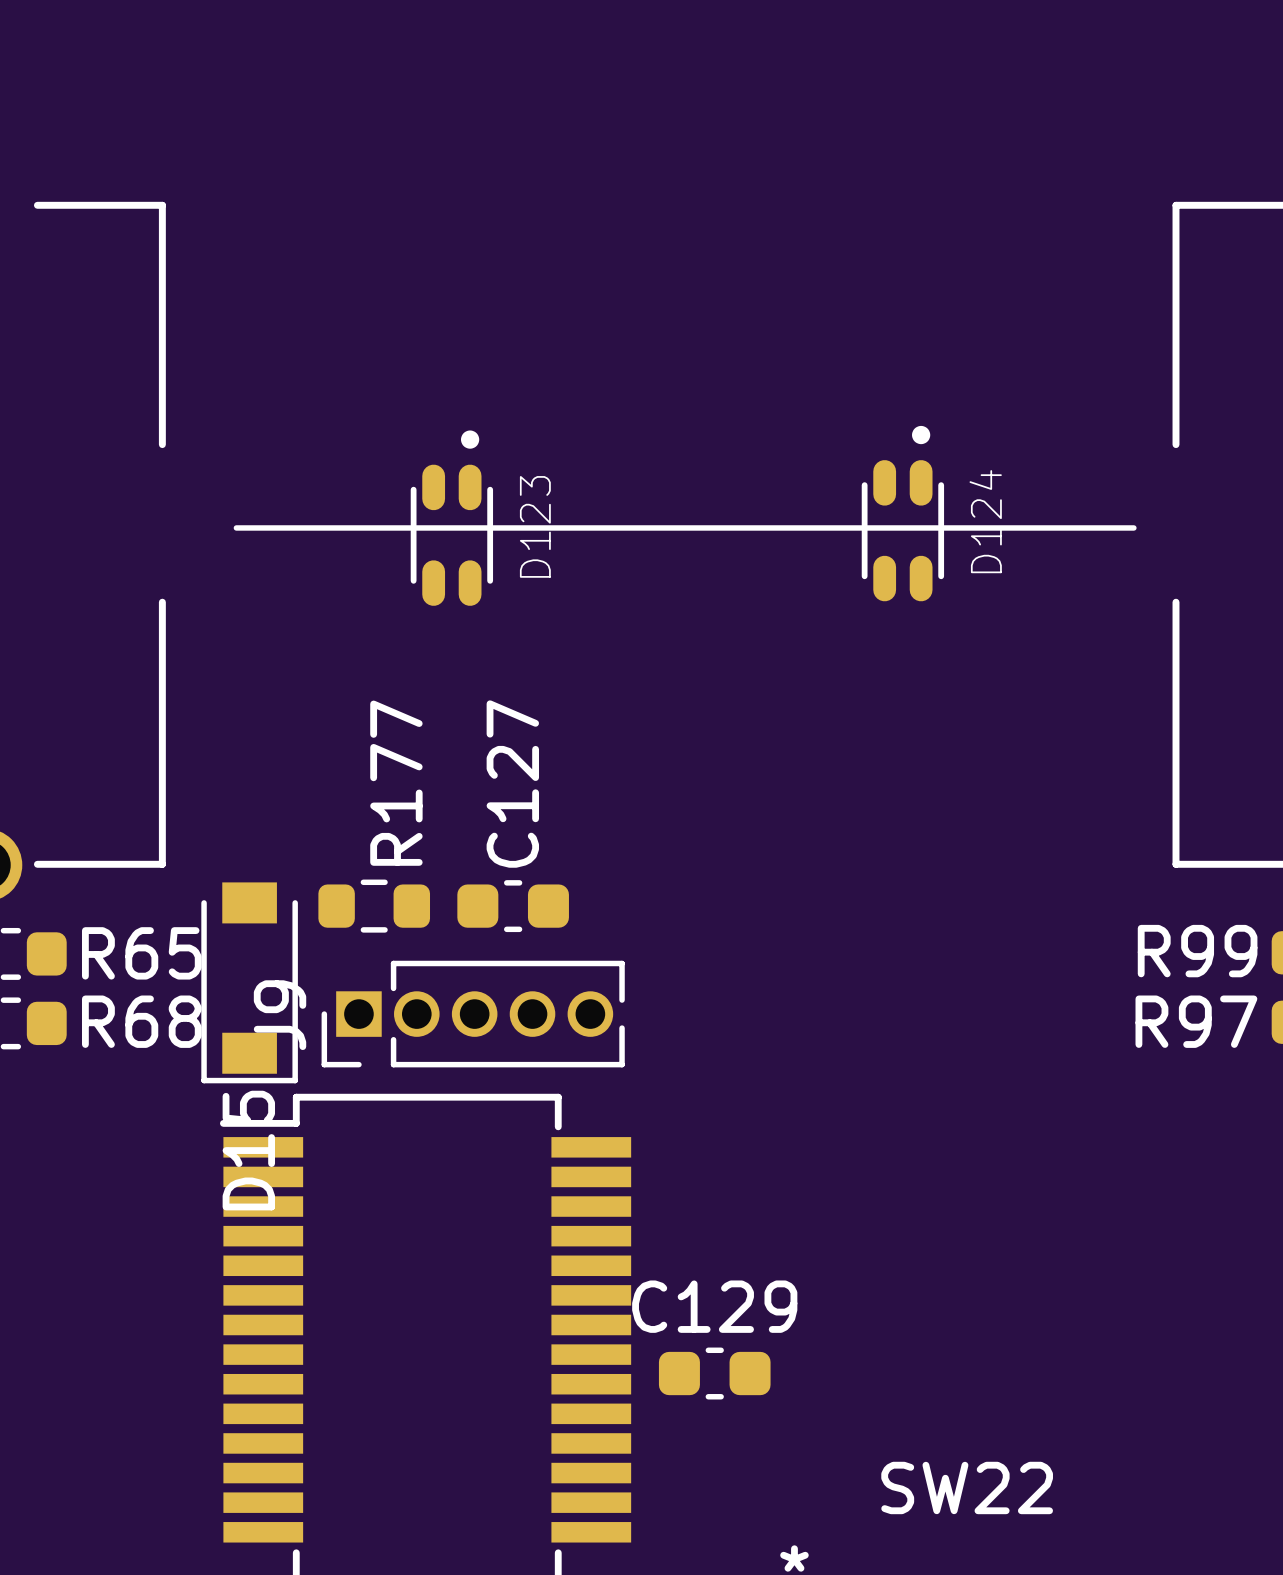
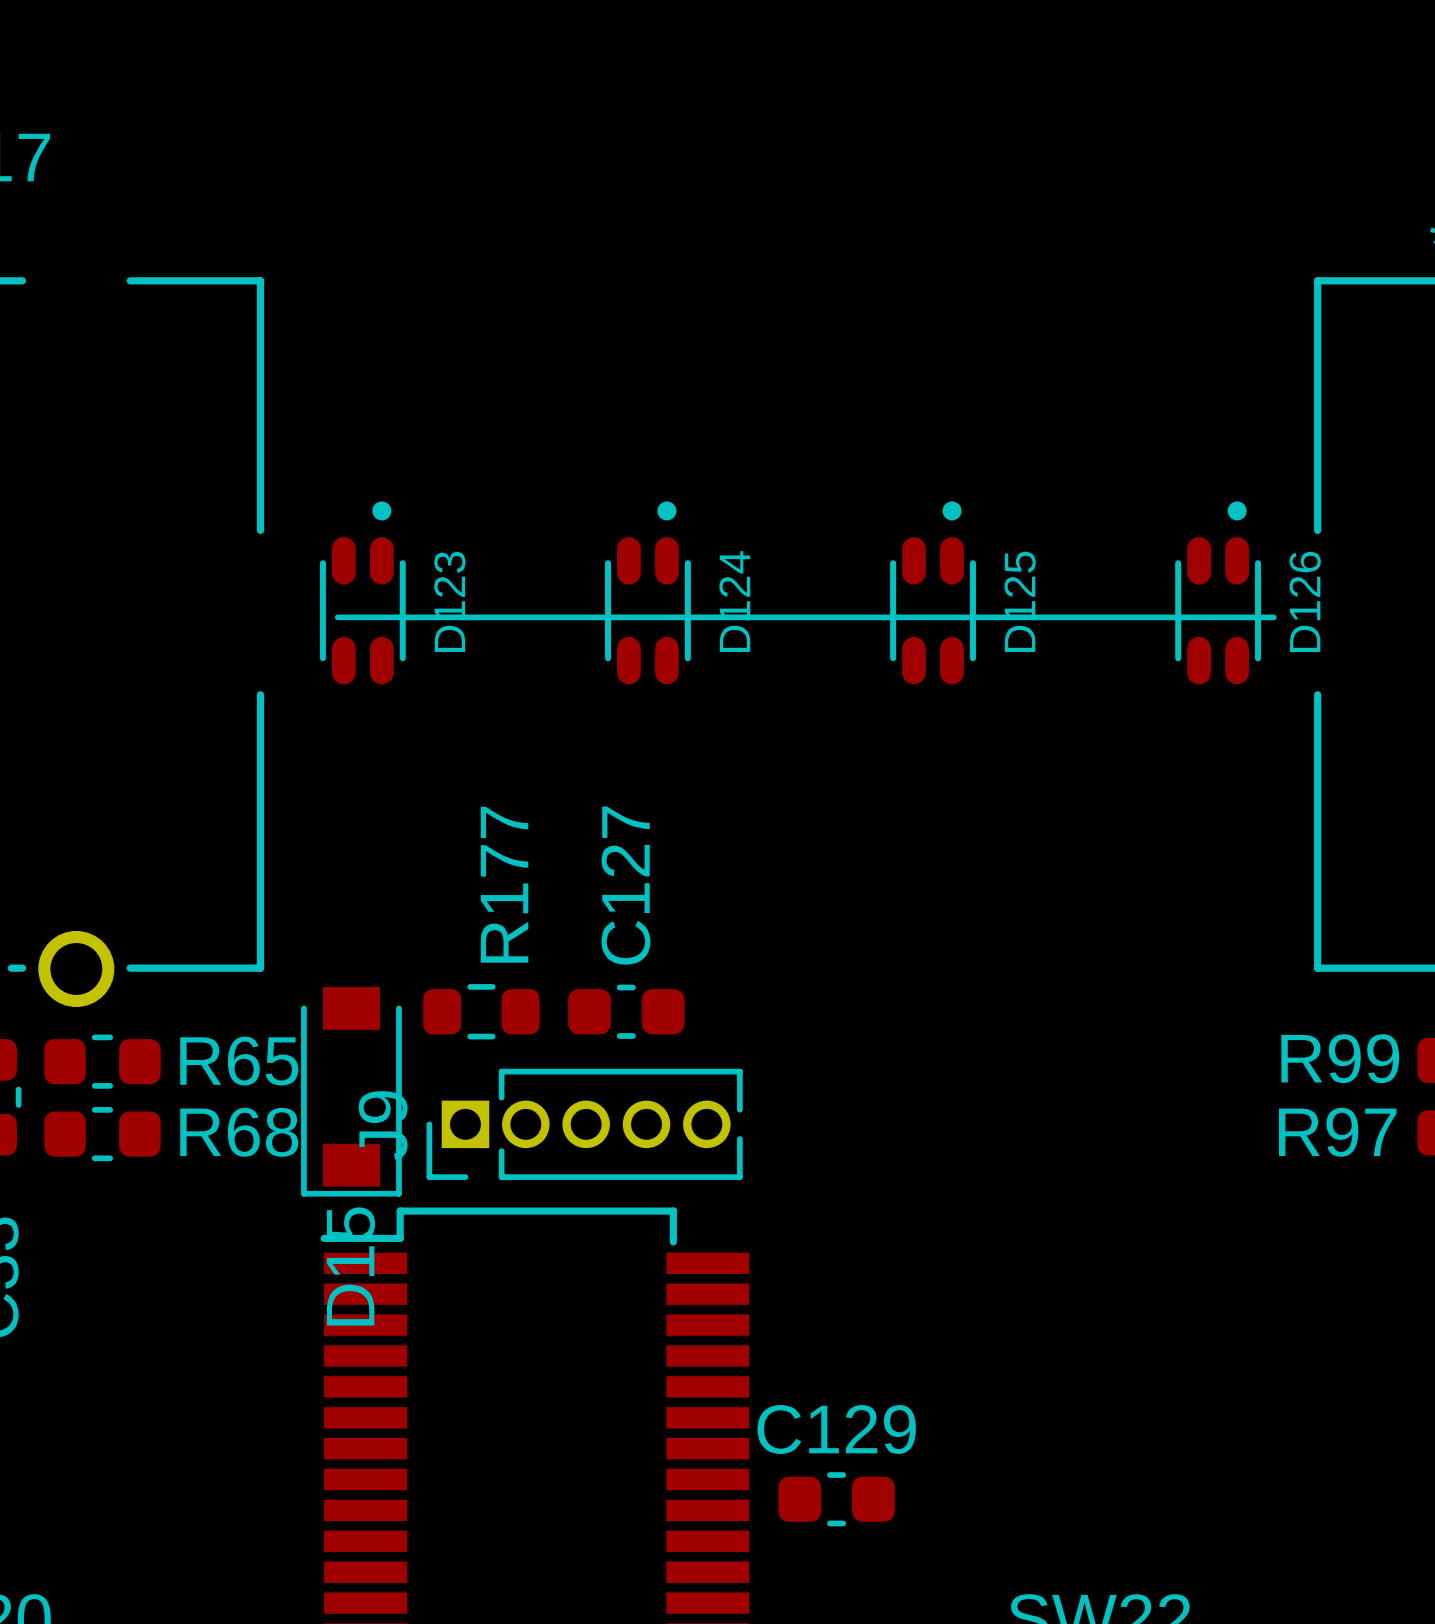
D125: none -> (933, 592)
D126: none -> (1218, 592)
D124 position: (902, 513) -> (647, 592)
D123 position: (451, 518) -> (362, 592)

